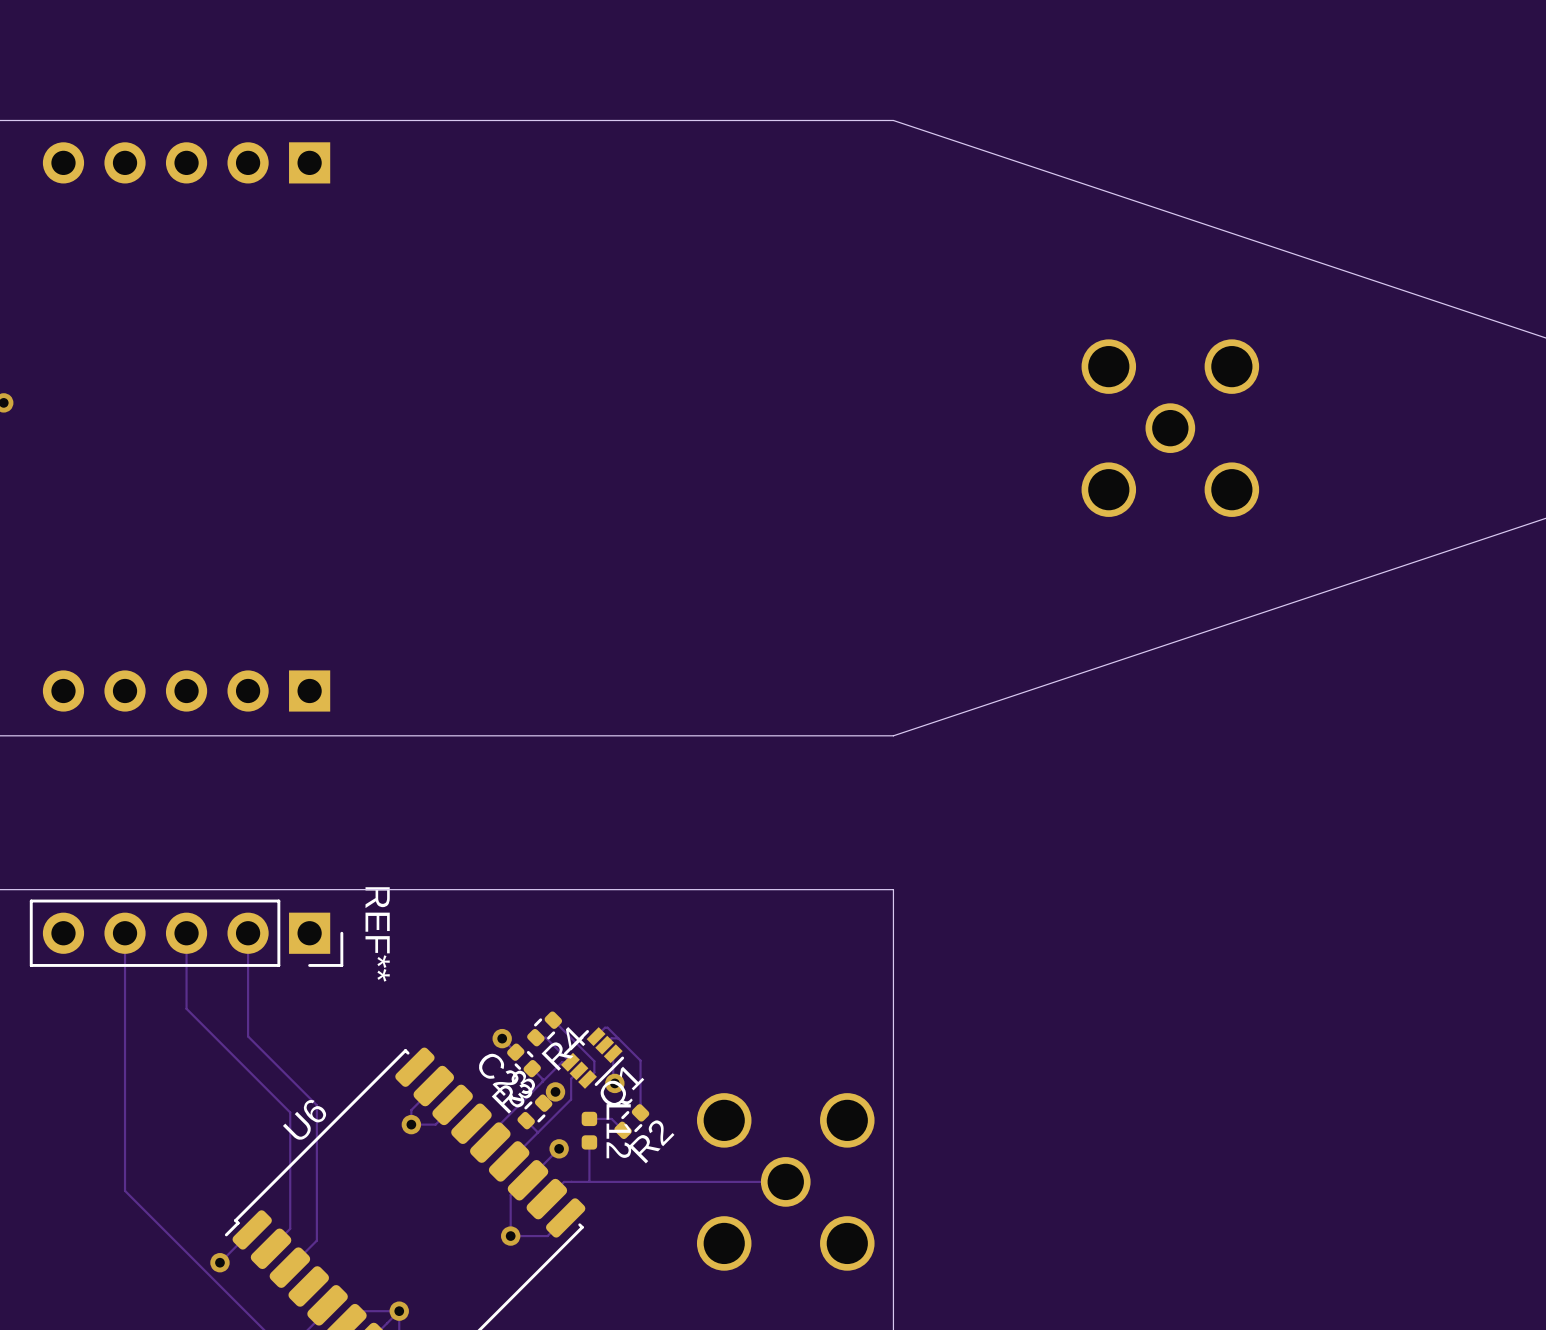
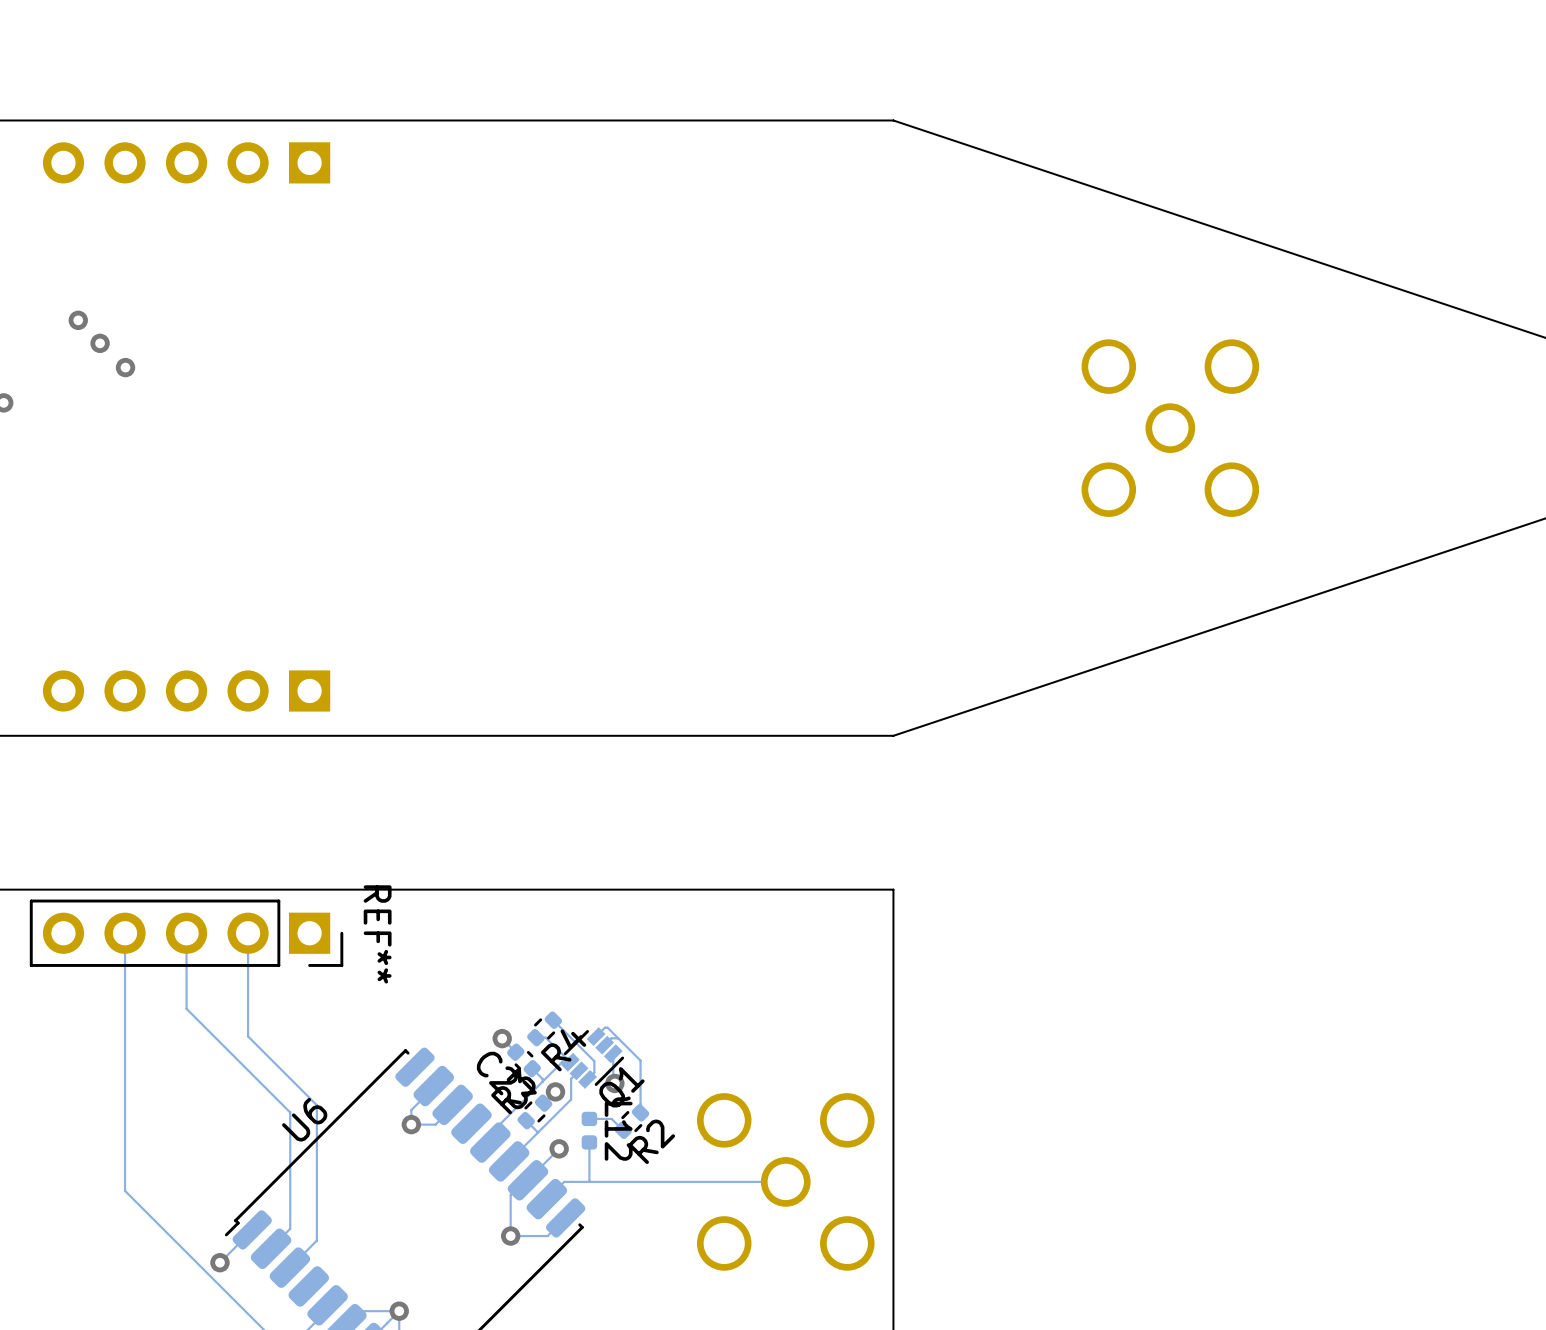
via: none -> (78, 320)
via: none -> (100, 343)
via: none -> (125, 367)

